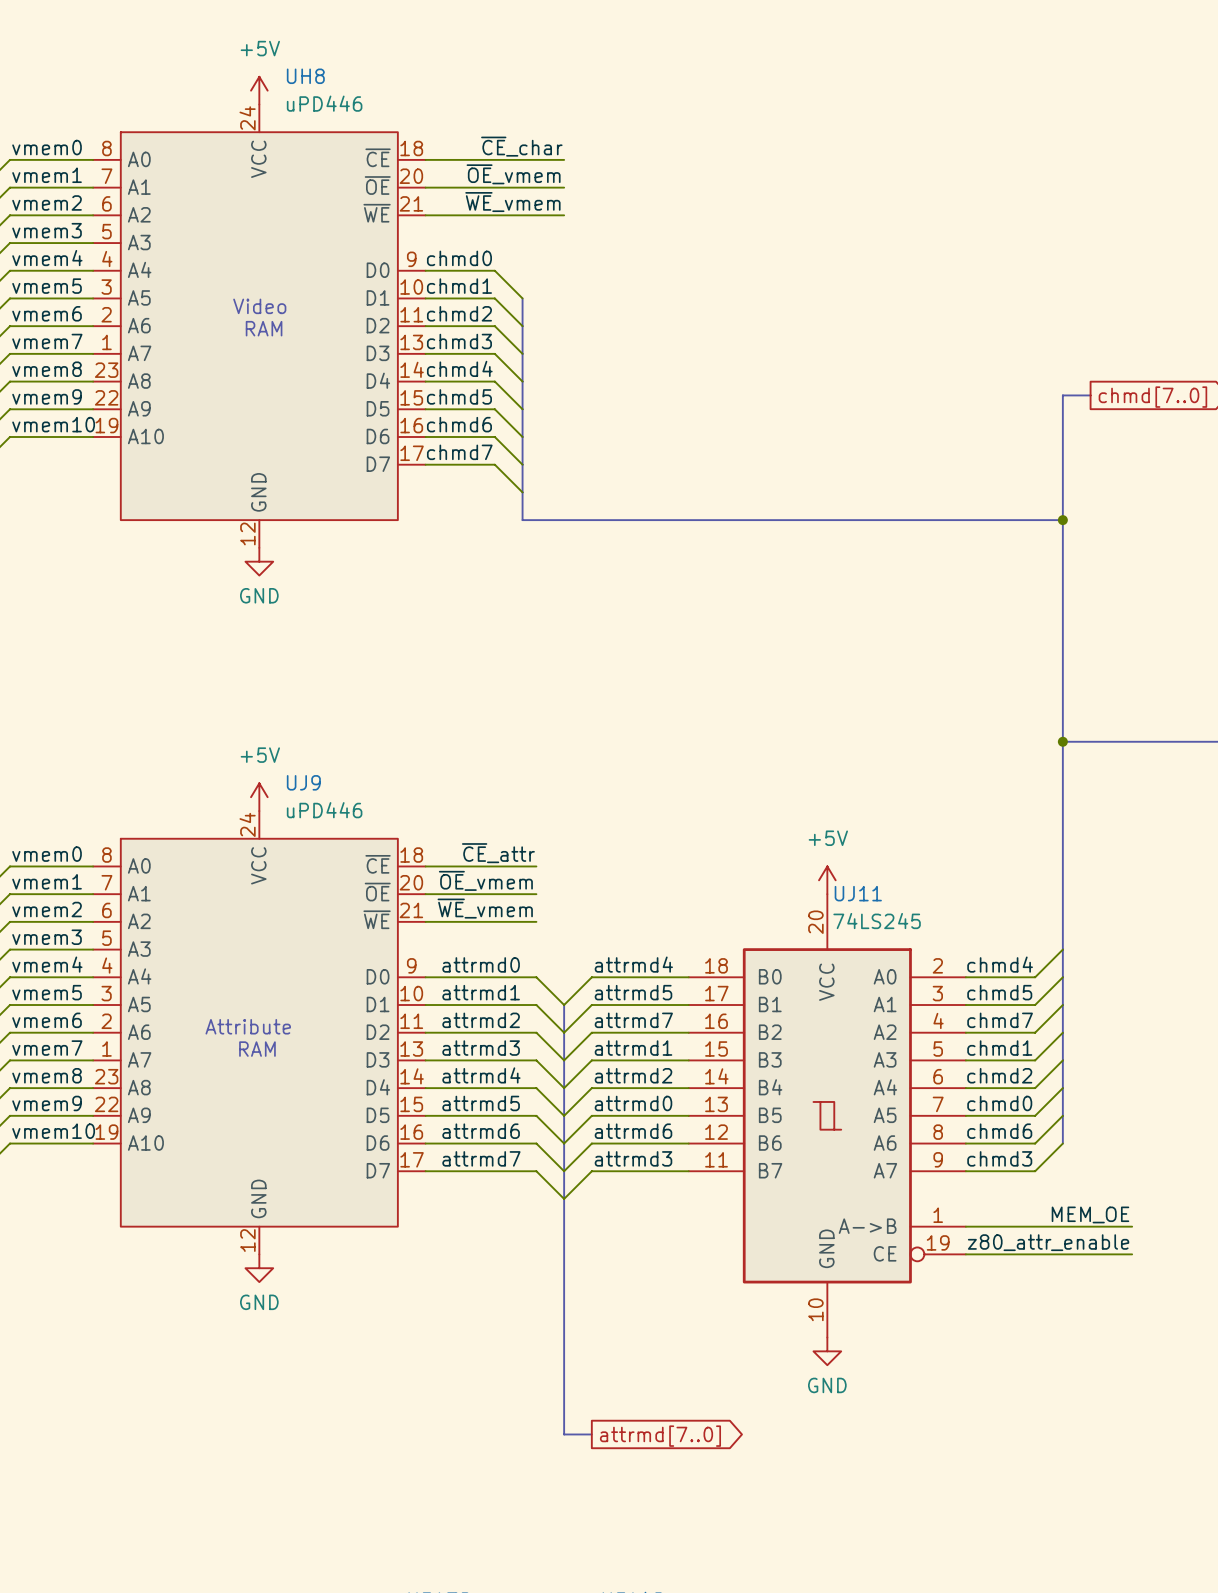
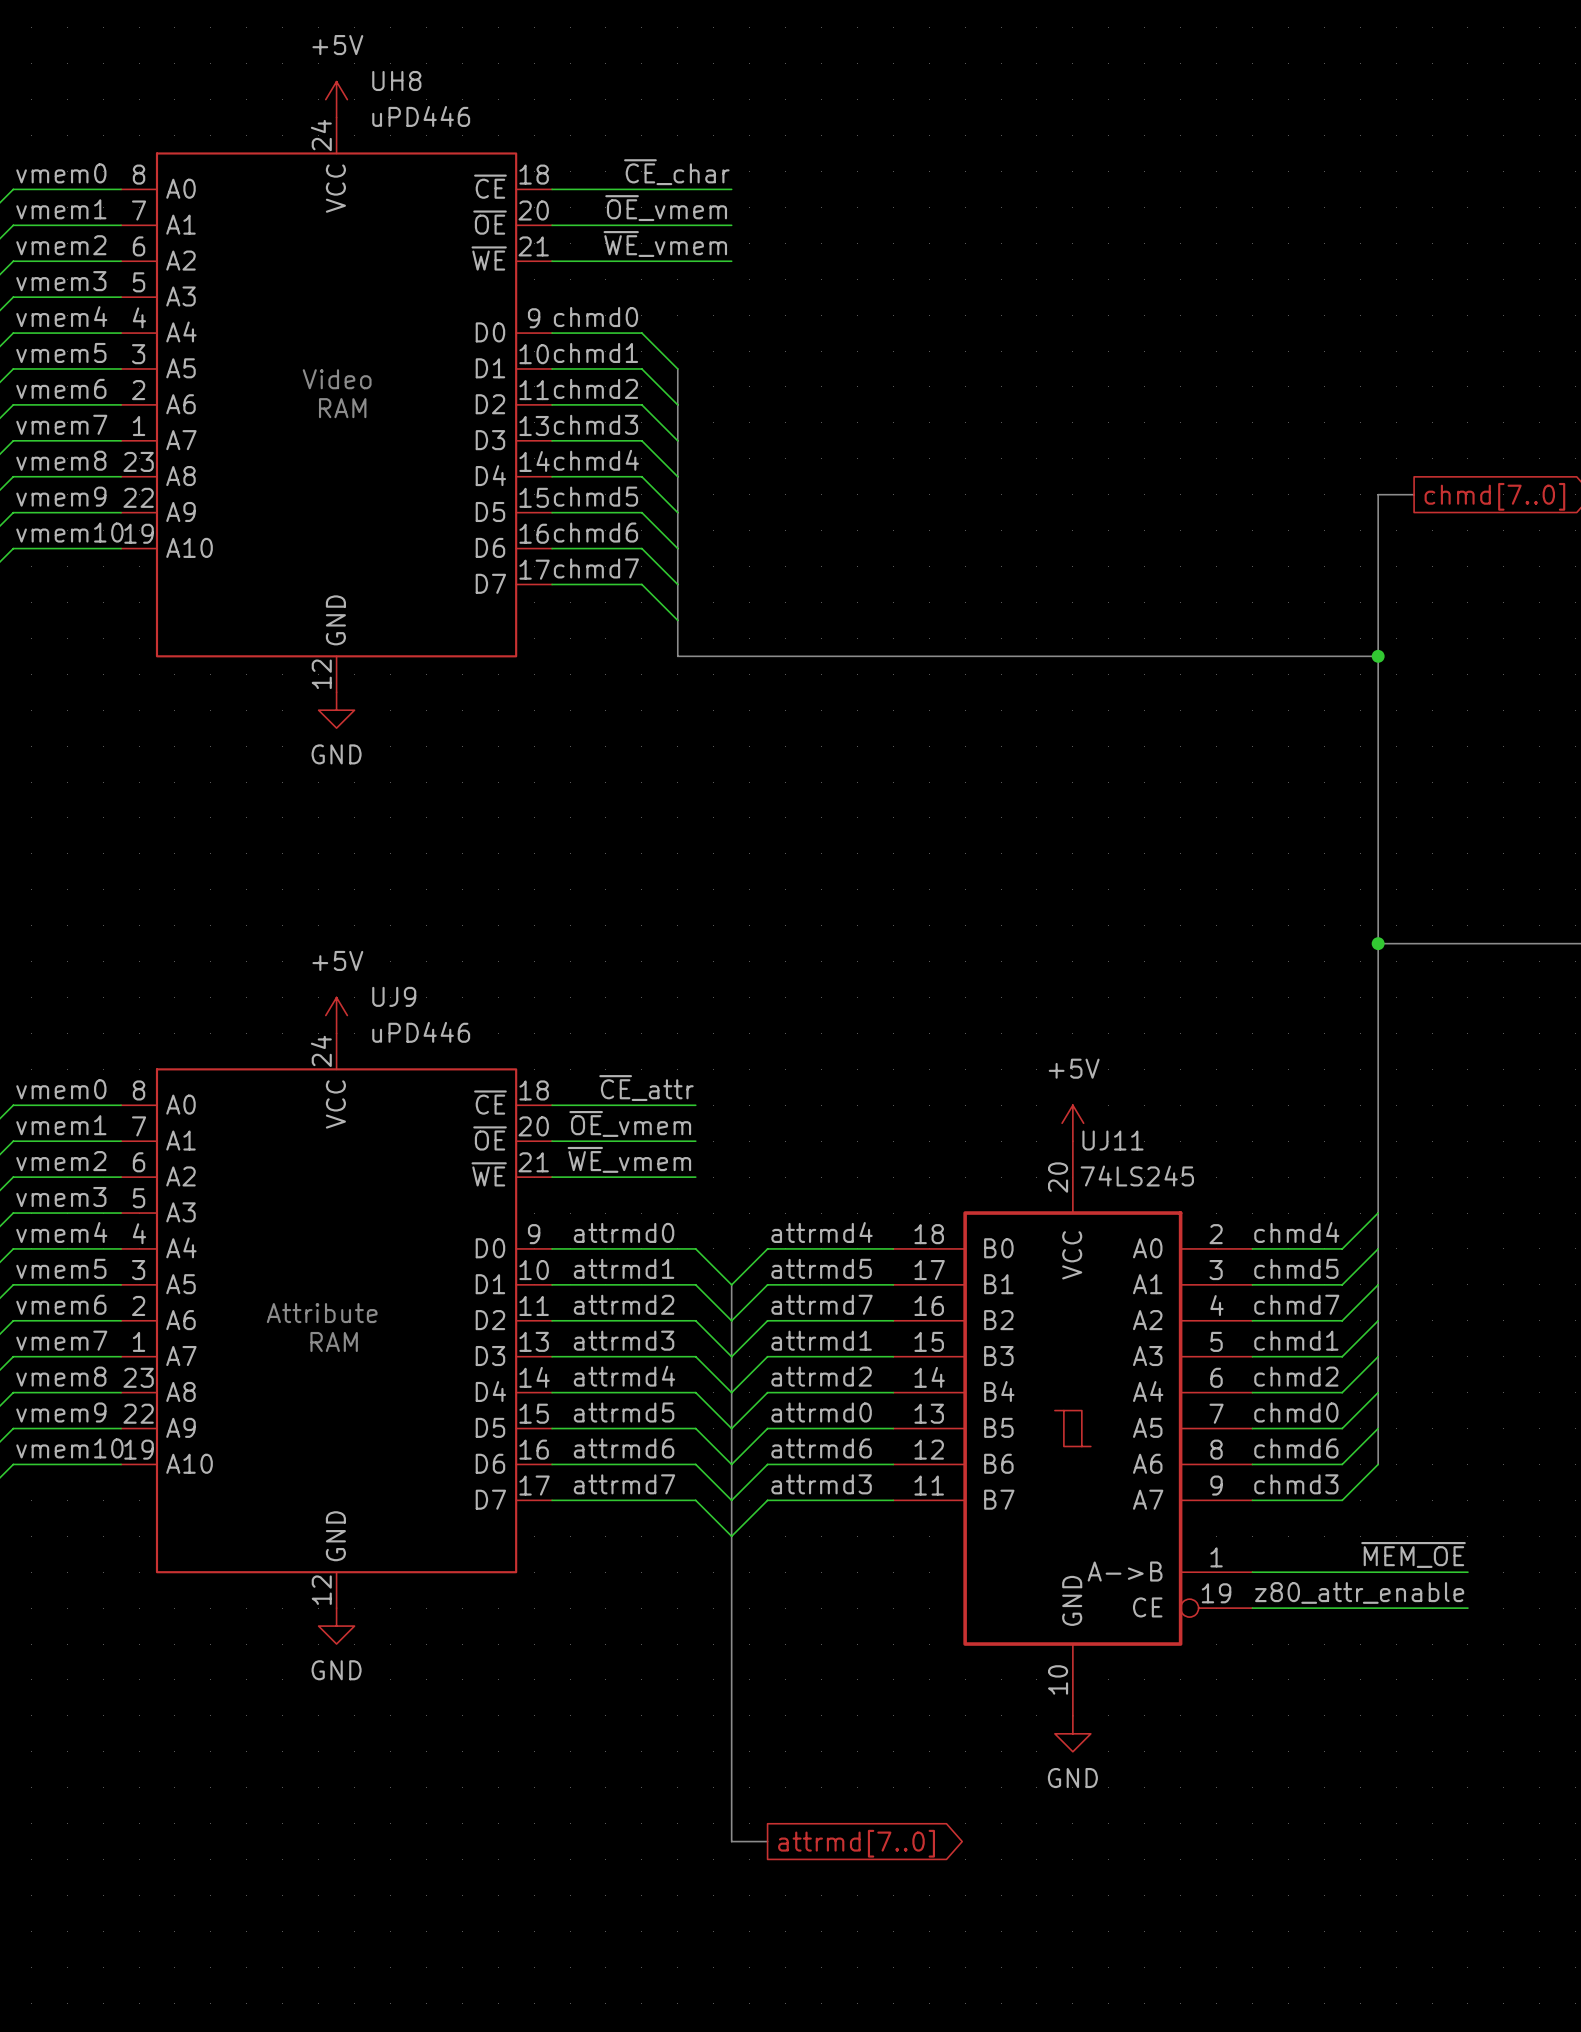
label: MEM_OE (1090, 1214) -> ~{MEM_OE} (1413, 1554)

